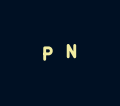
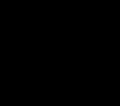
text: N (71, 51) -> none
text: P (47, 53) -> none

